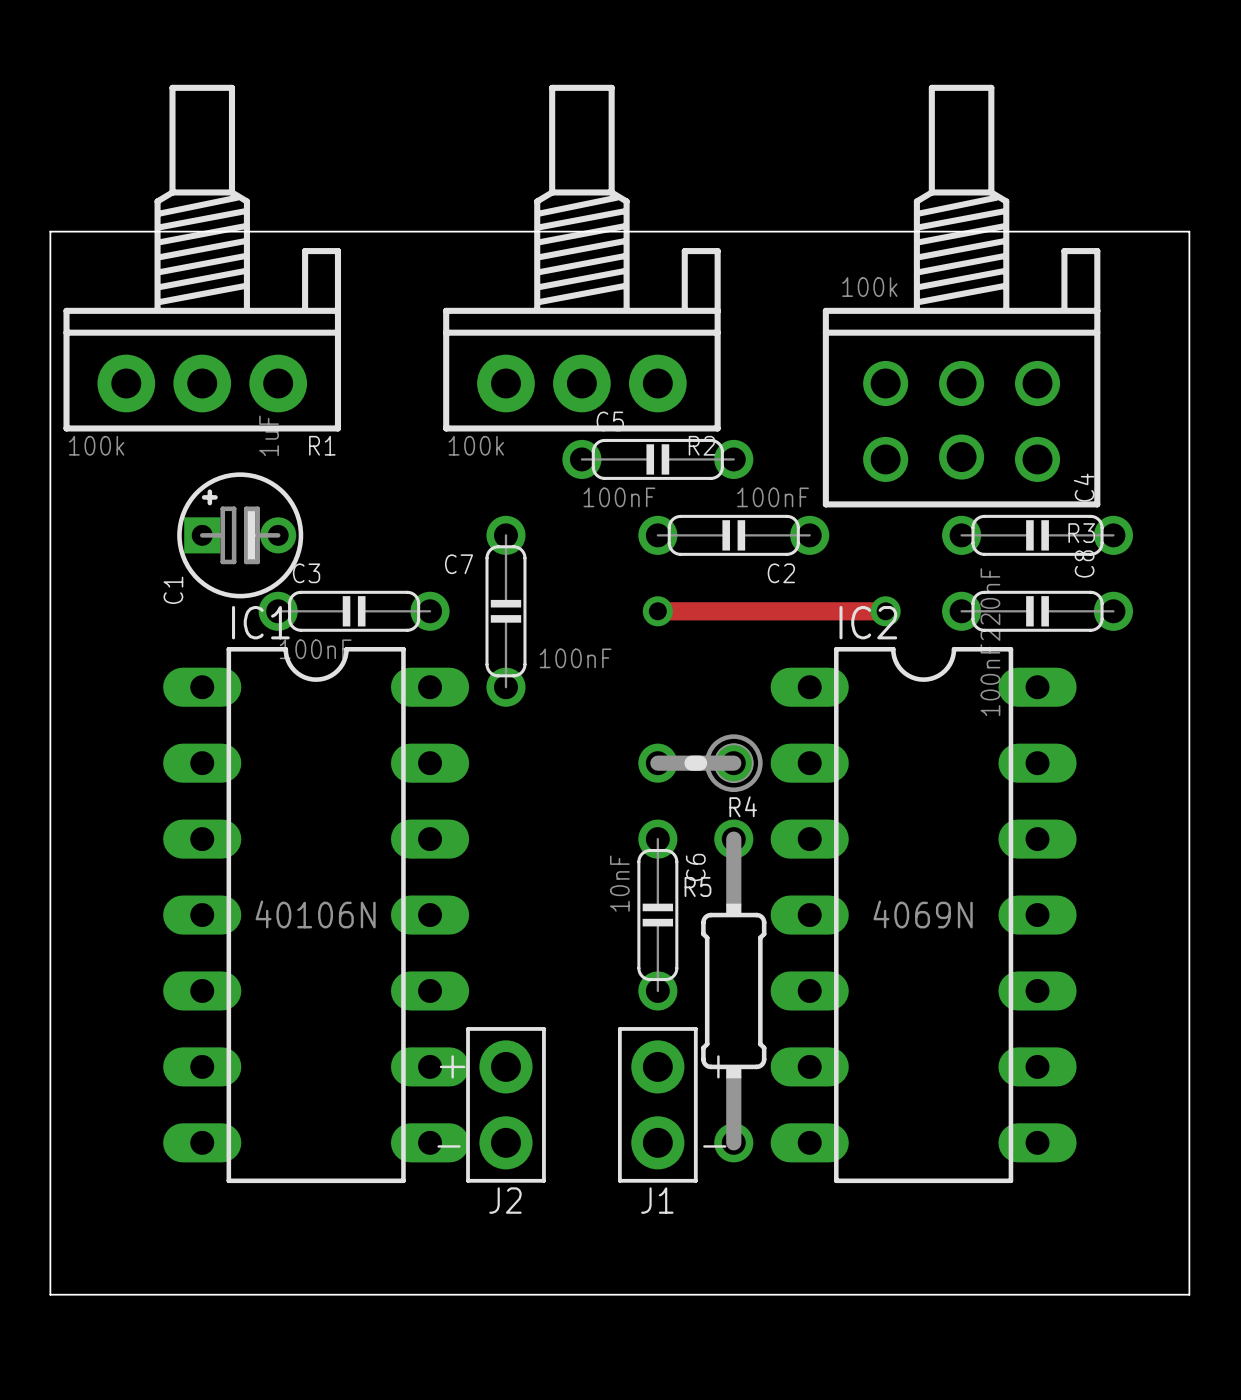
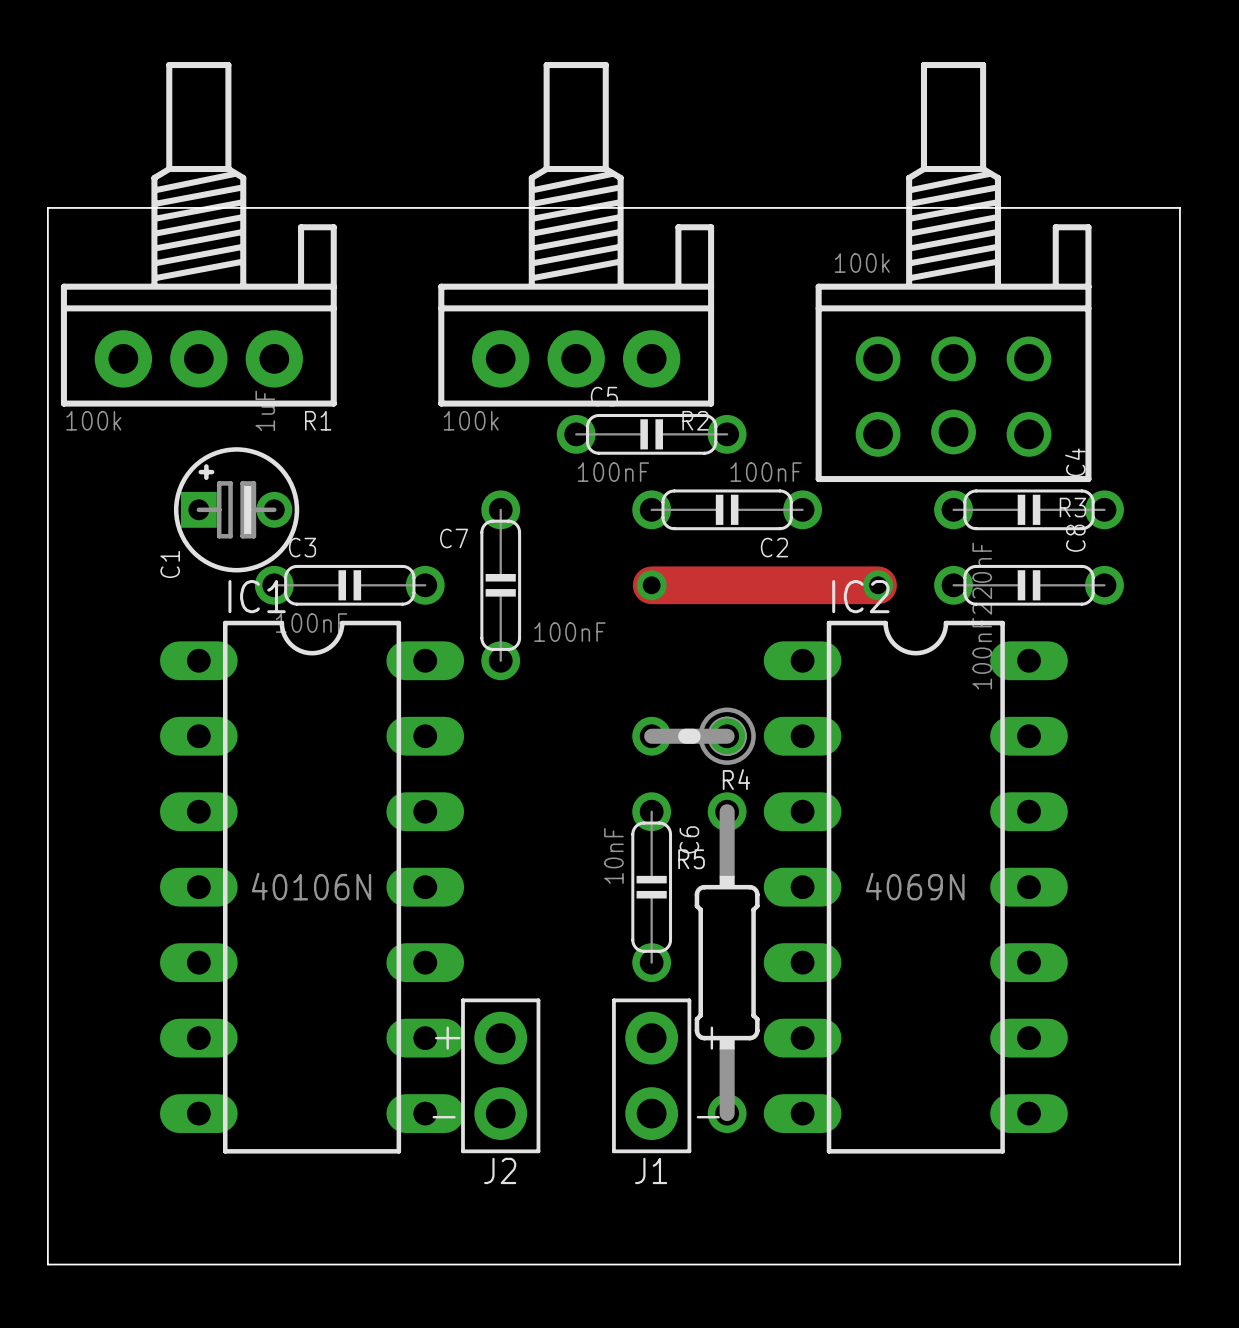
track width: thin (657, 611) (885, 611) -> thick (651, 585) (878, 585)

